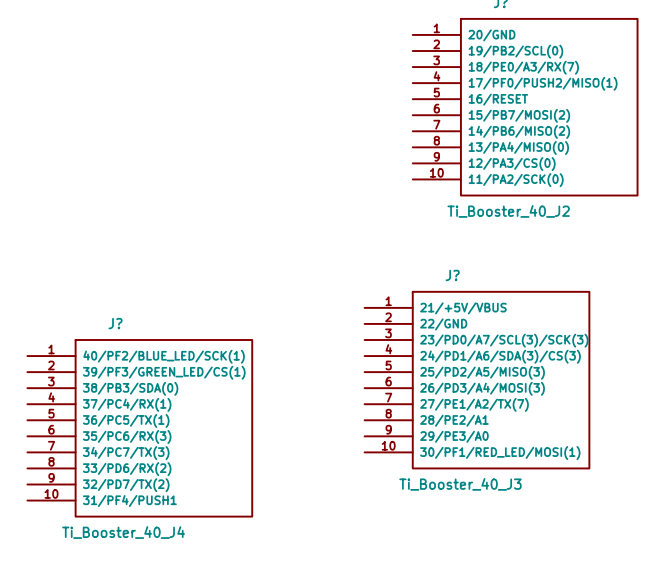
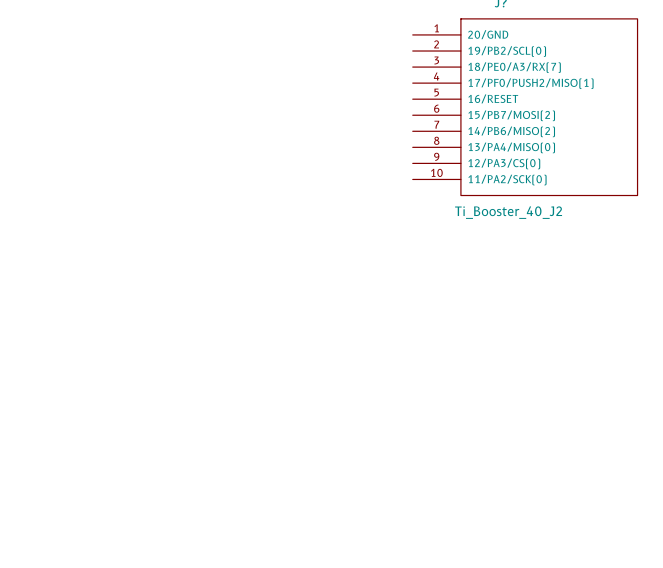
J?: Ti_Booster_40_J3 (476, 380) -> none
J?: Ti_Booster_40_J4 (139, 428) -> none

